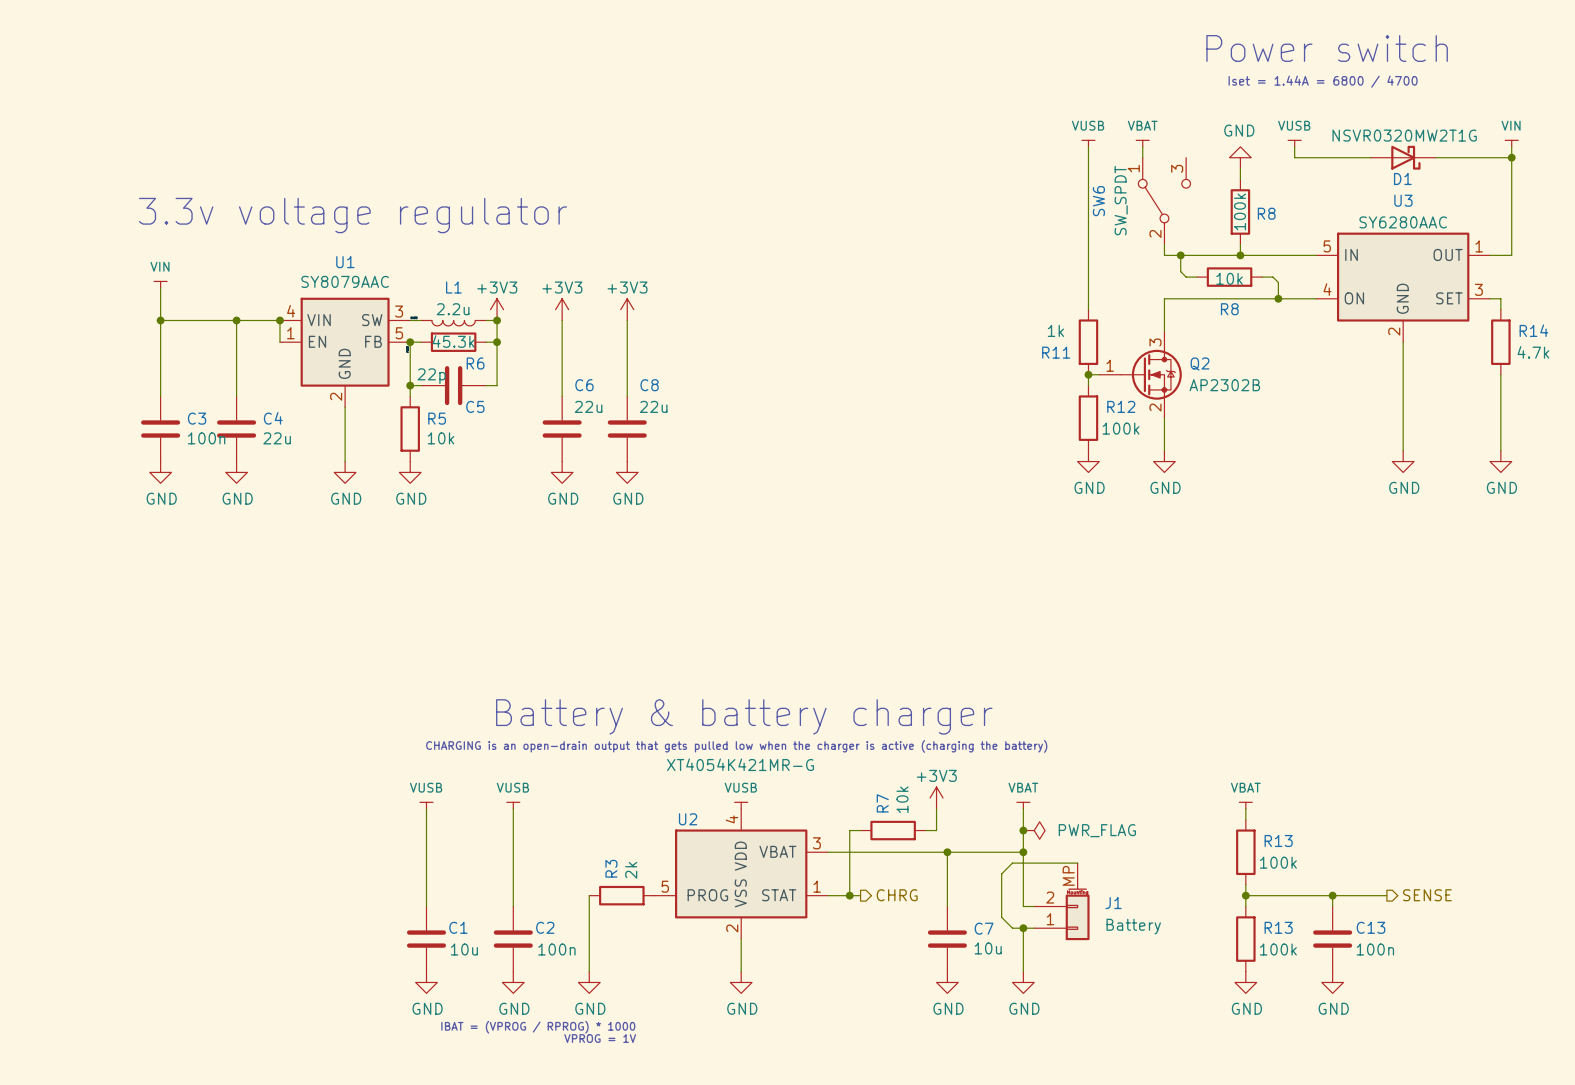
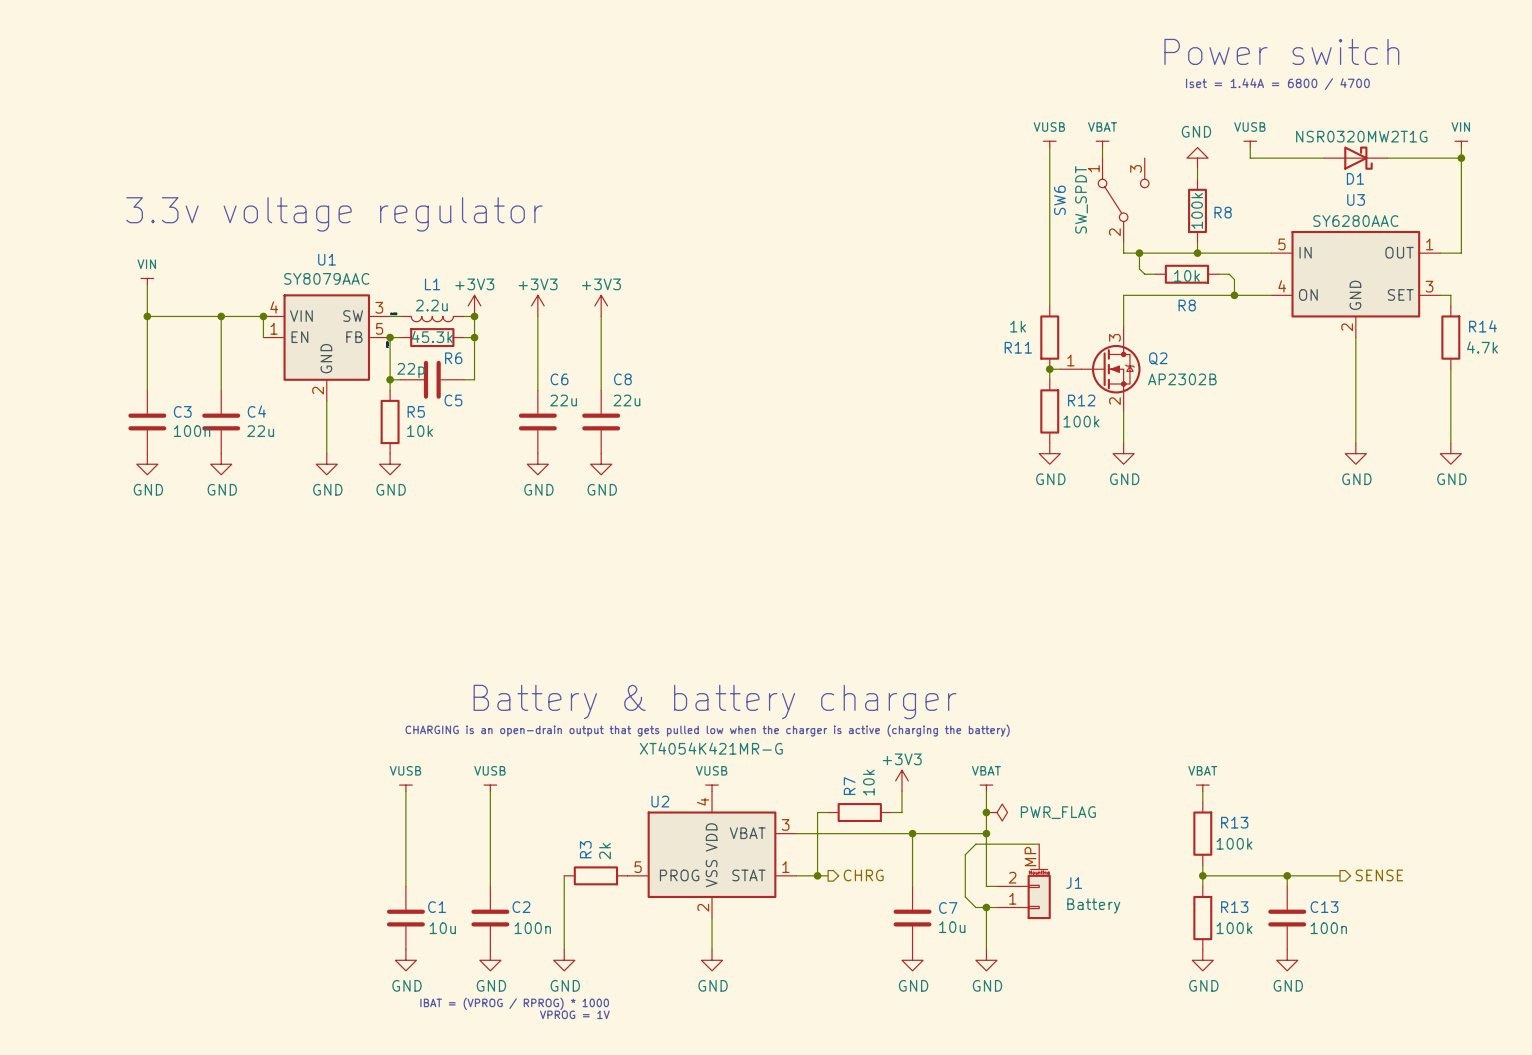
D1 value: NSVR0320MW2T1G (1404, 135) -> NSR0320MW2T1G (1361, 136)

